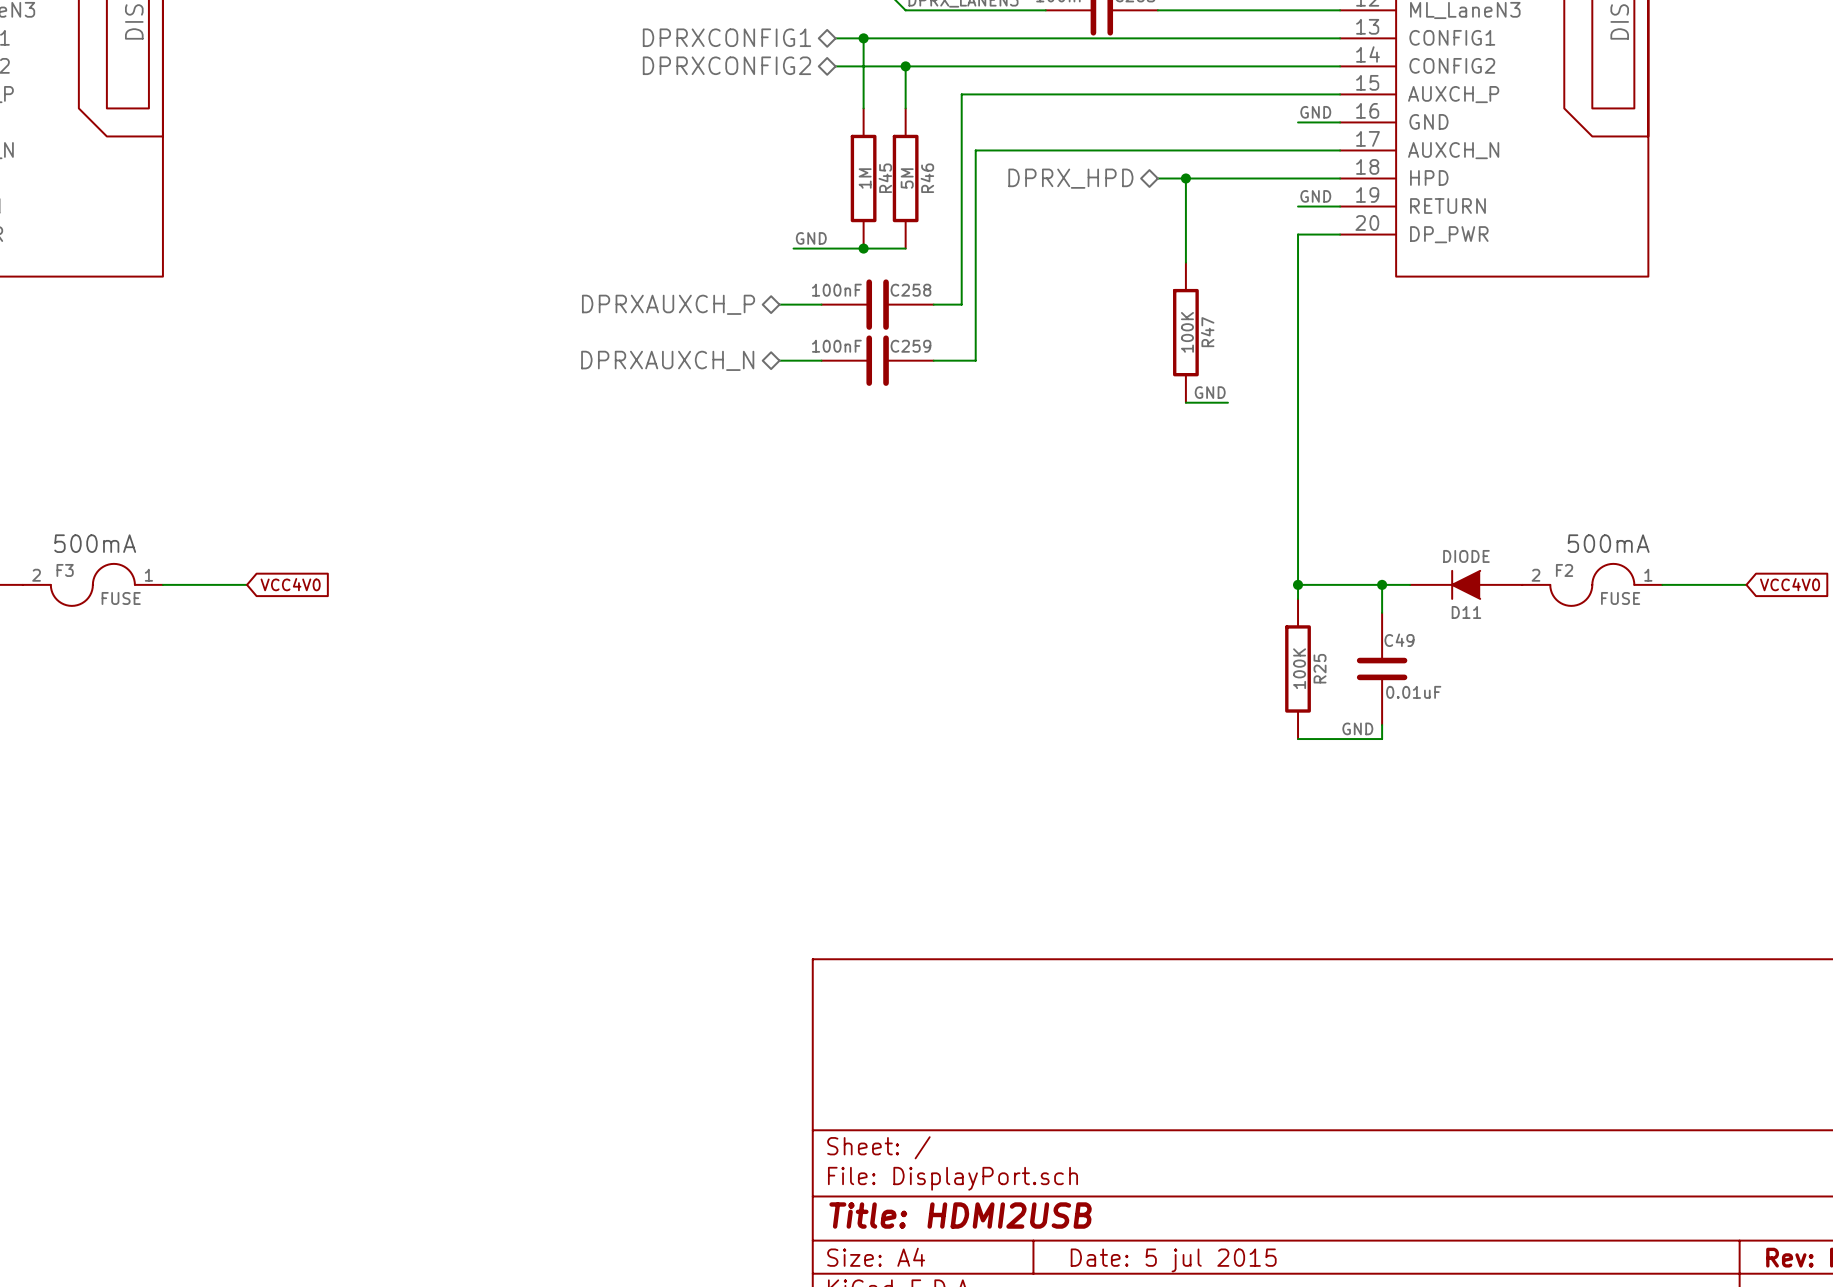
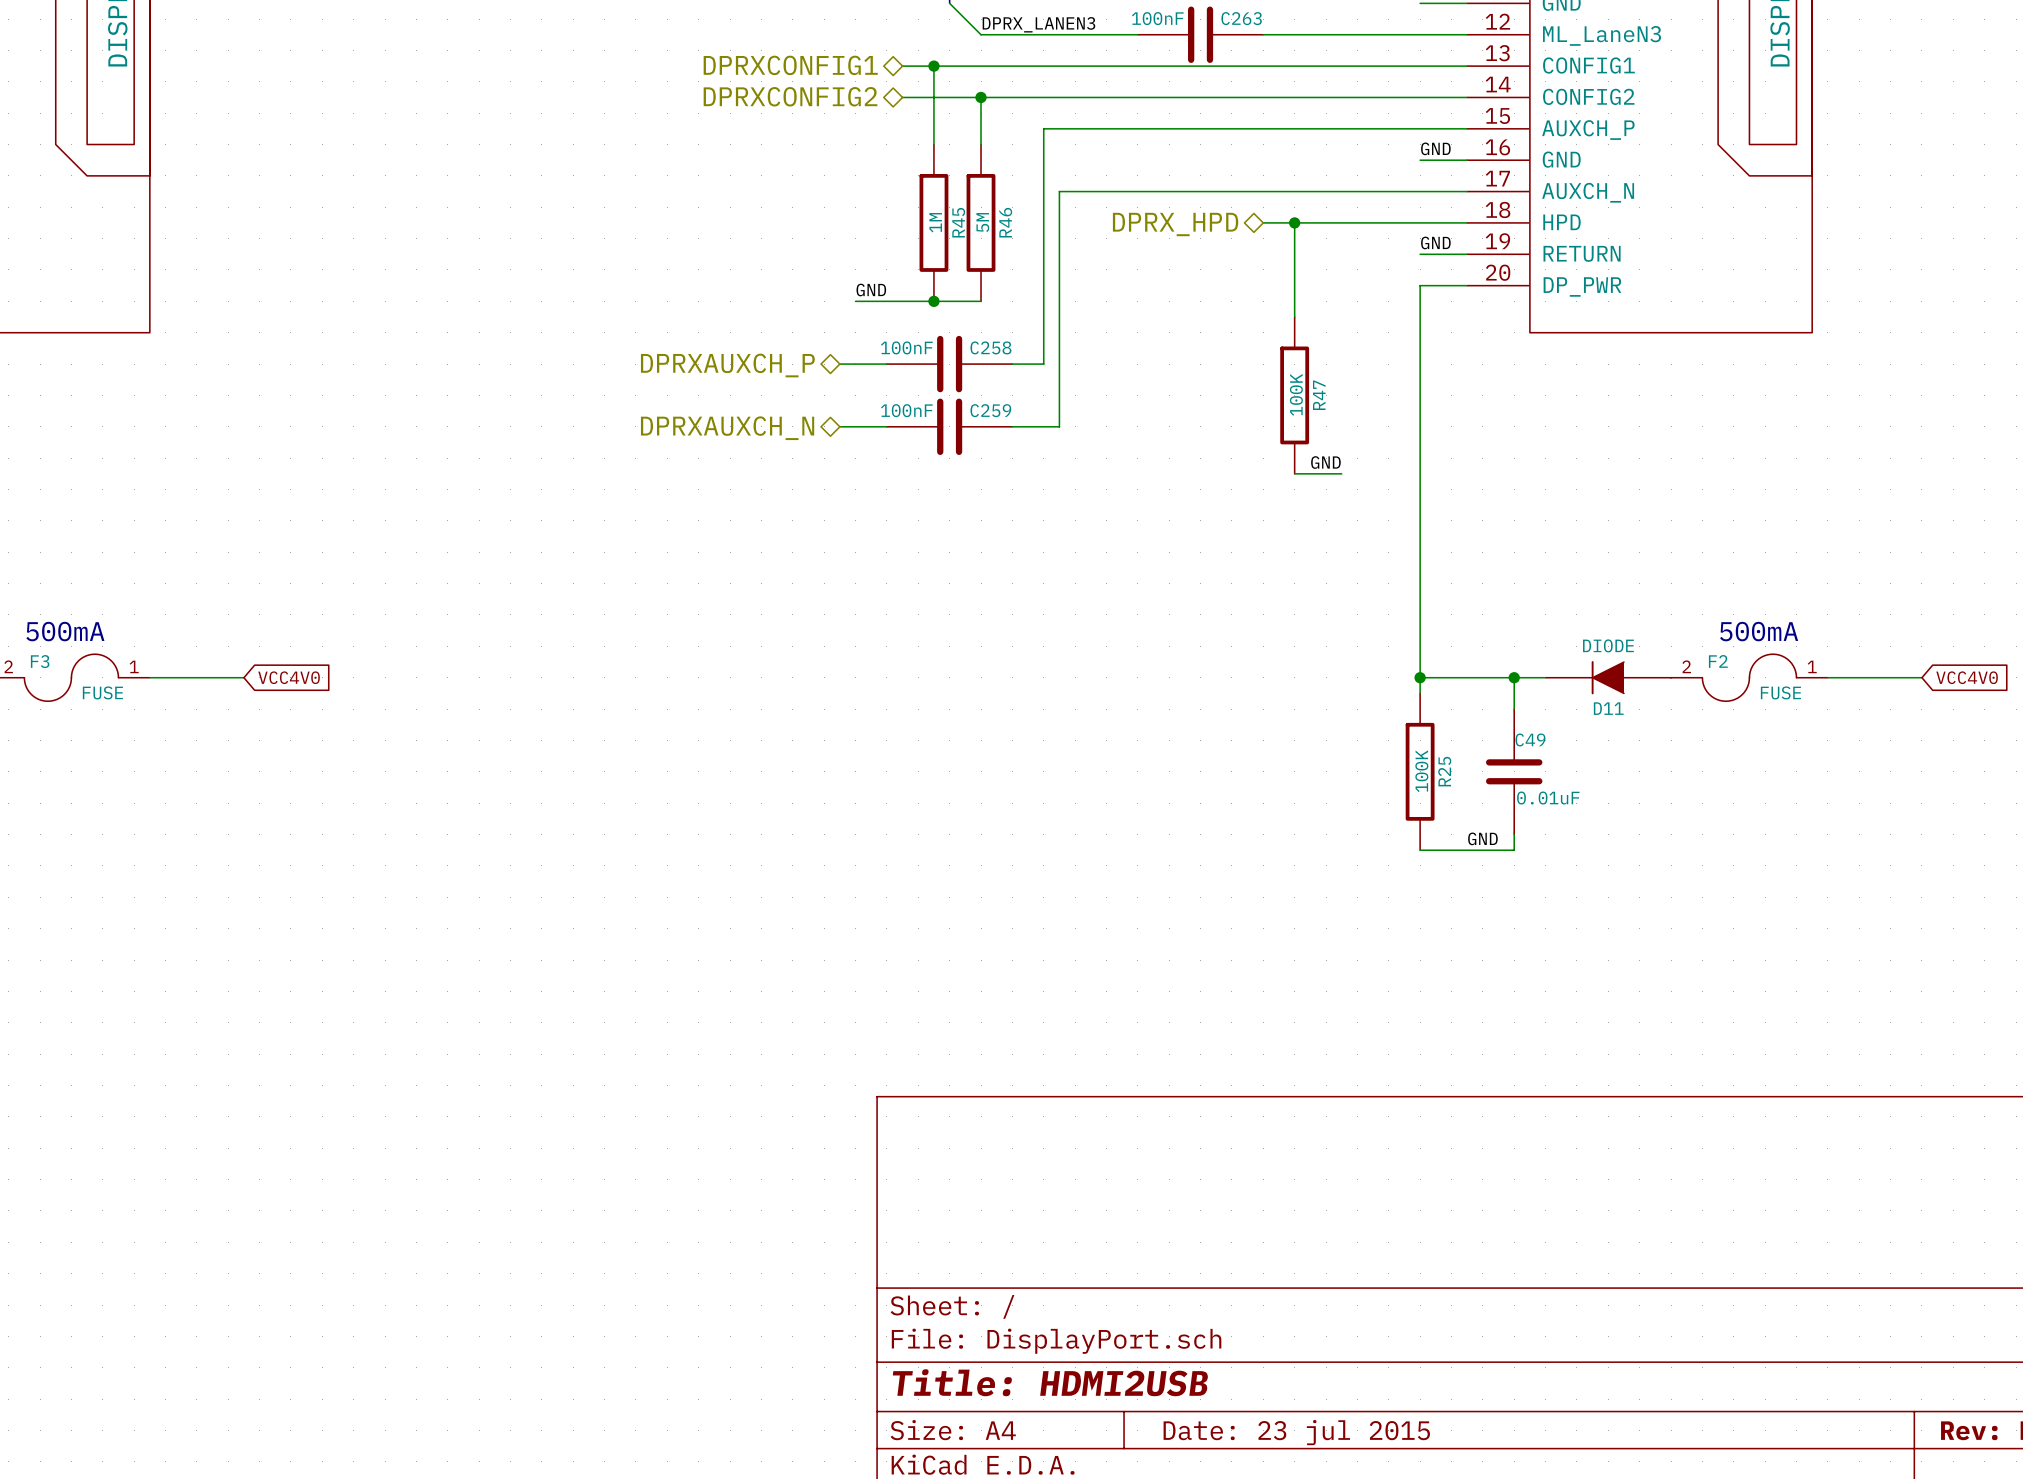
title block: Date: 5 jul 2015 (1173, 1260) -> Date: 23 jul 2015 (1296, 1432)

